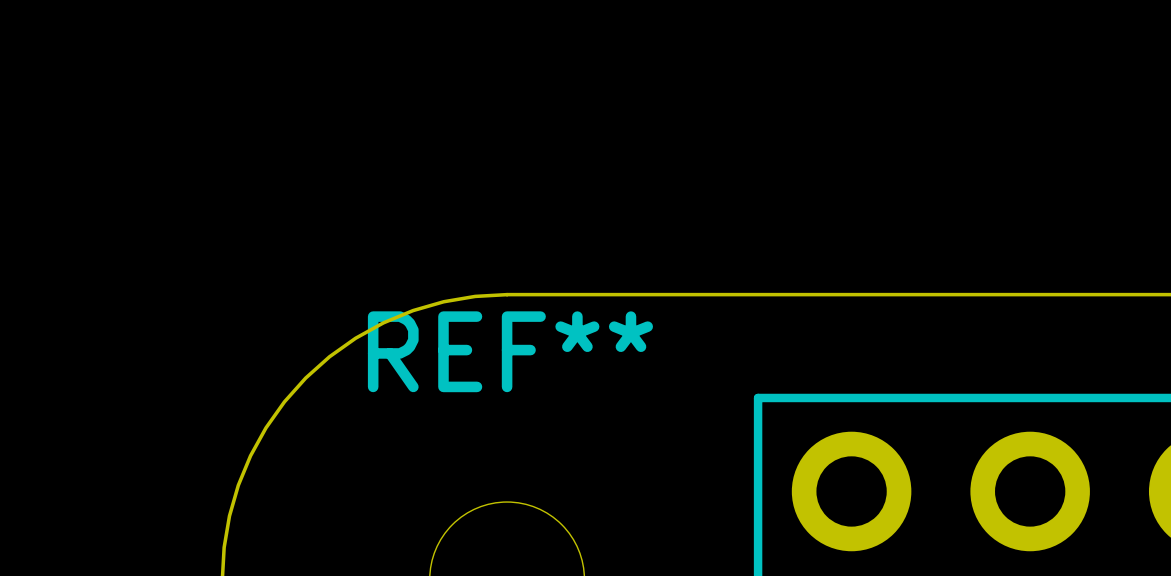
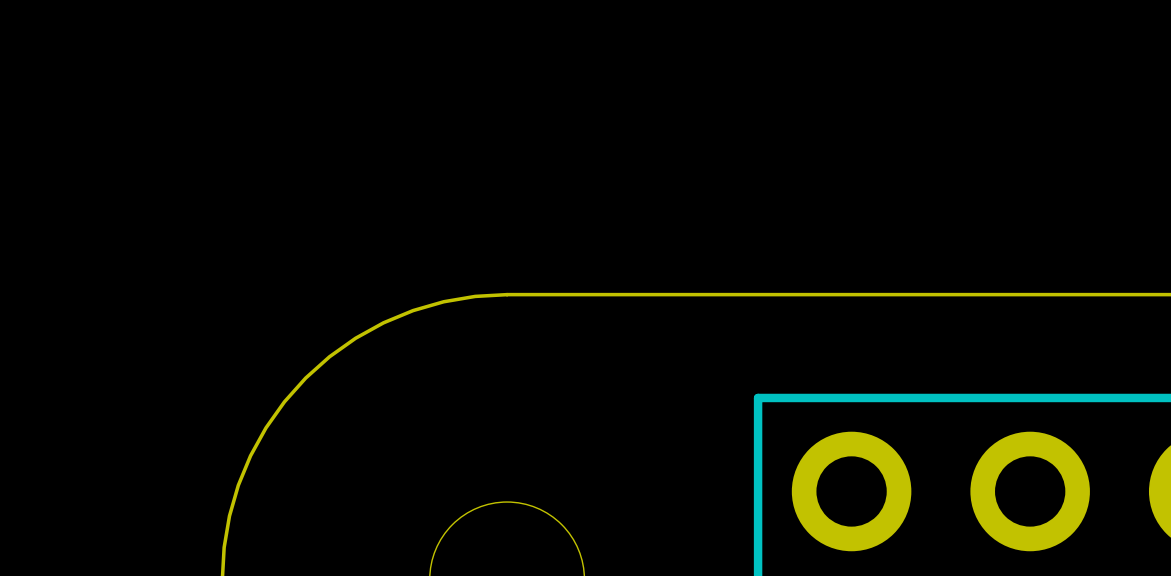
REF** name: REF** (510, 351) -> none

